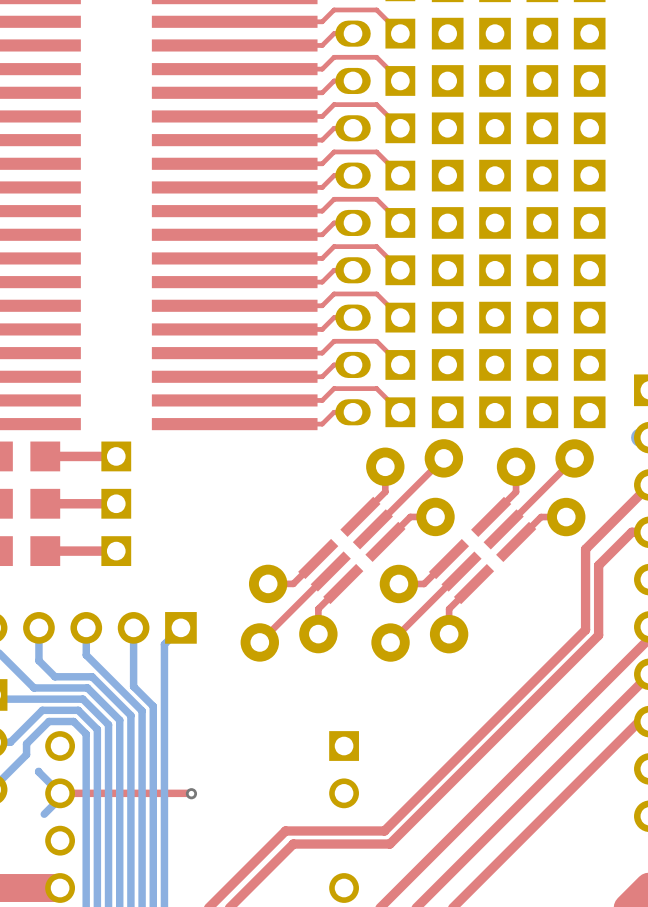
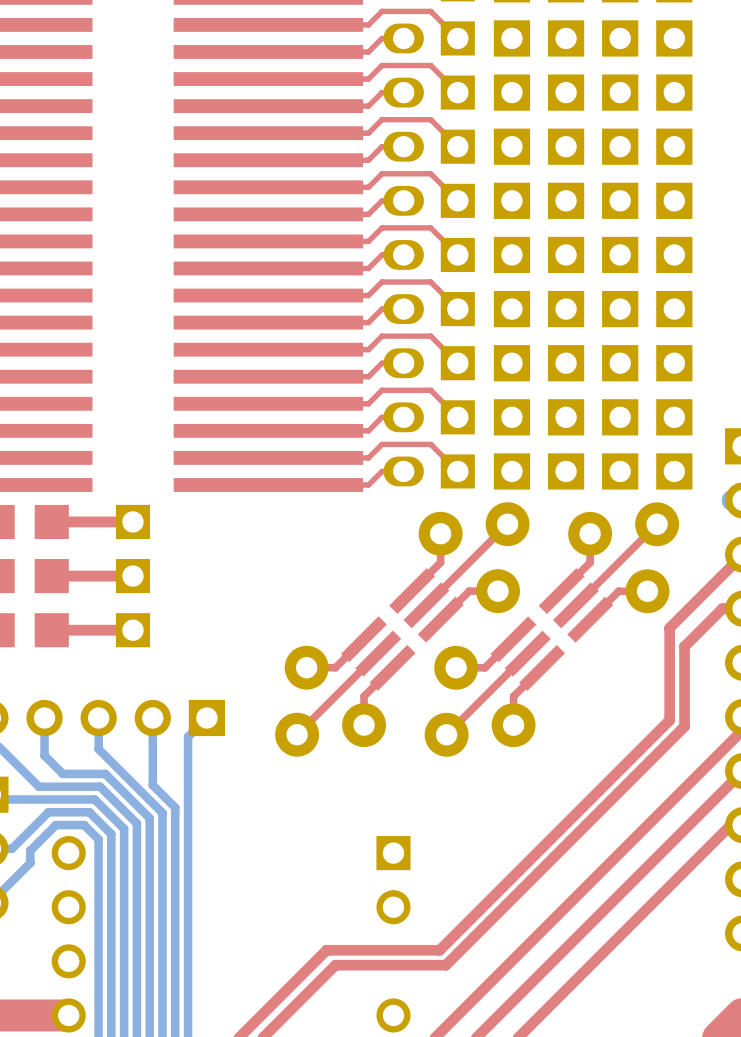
bottom track: (38, 771) (60, 793) (60, 798) (44, 814) -> none
top track: (60, 793) (191, 793) -> none
via: (191, 793) -> none

